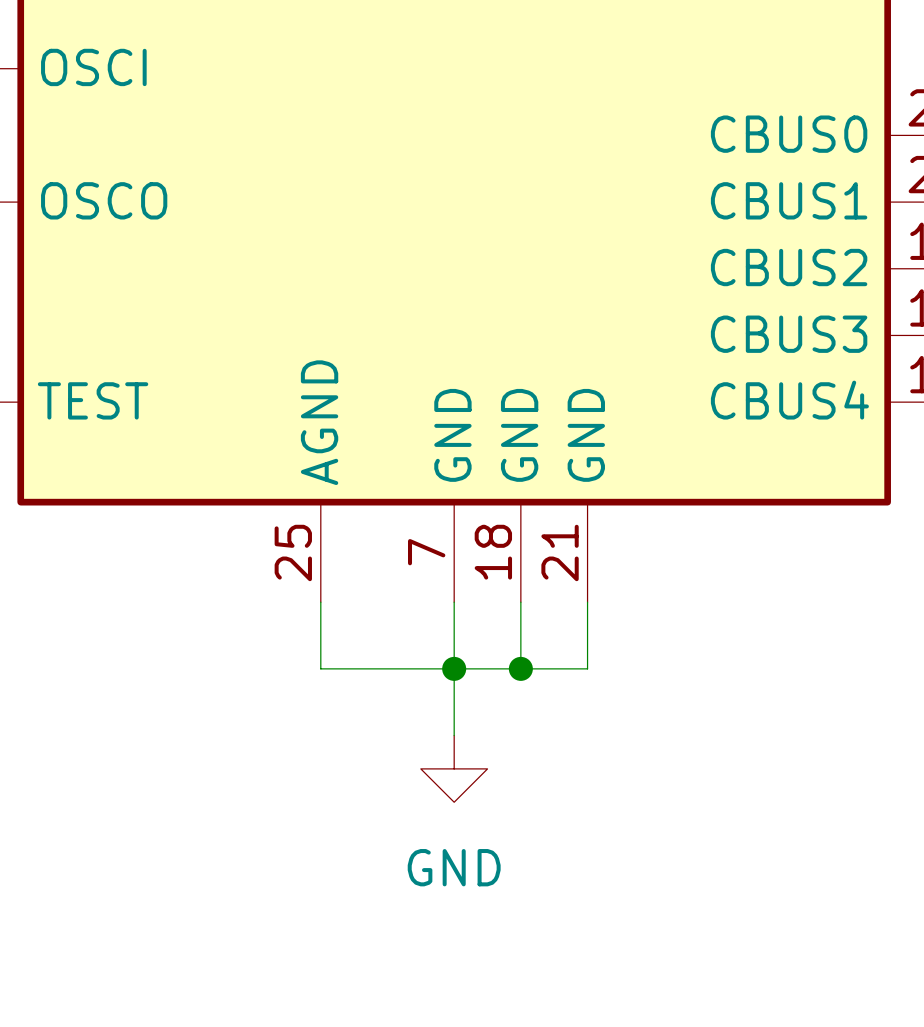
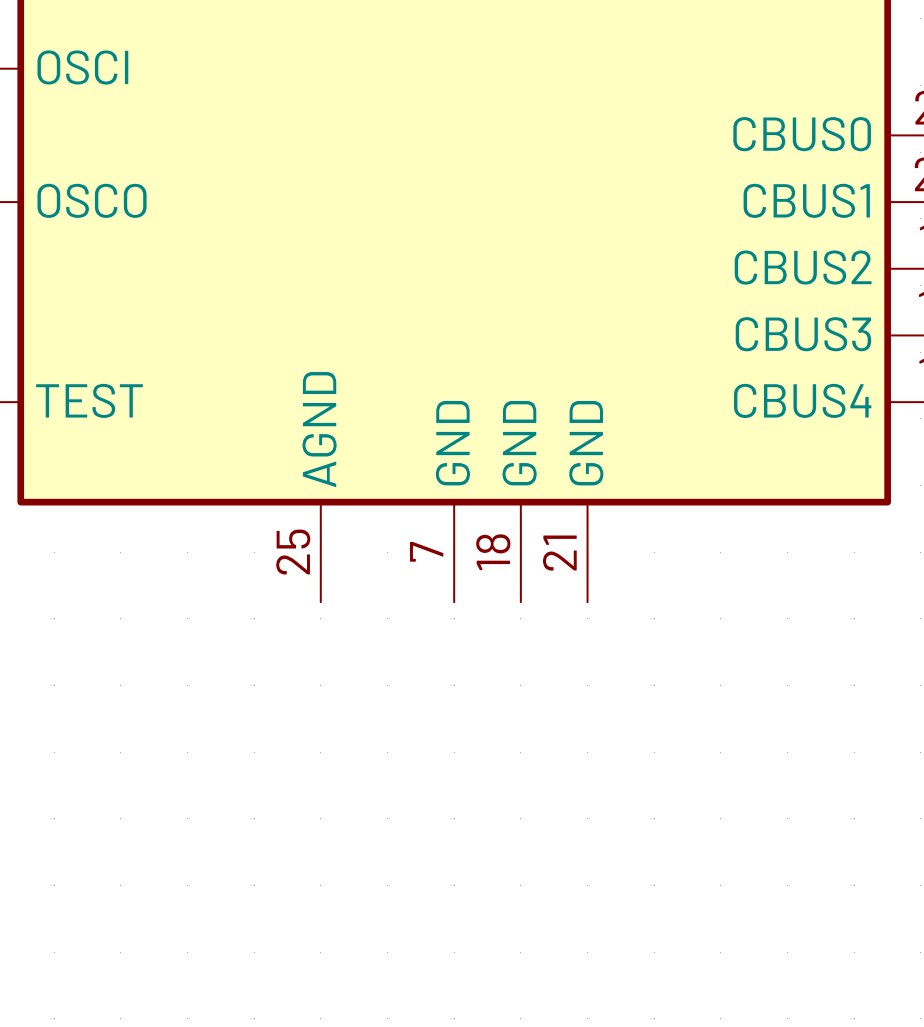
wire: (320, 602) (320, 668) (587, 668) (587, 602) -> none
wire: (454, 602) (454, 735) -> none
wire: (520, 602) (520, 668) -> none
junction: (454, 668) -> none
junction: (520, 668) -> none
power symbol: GND (454, 768) -> none

